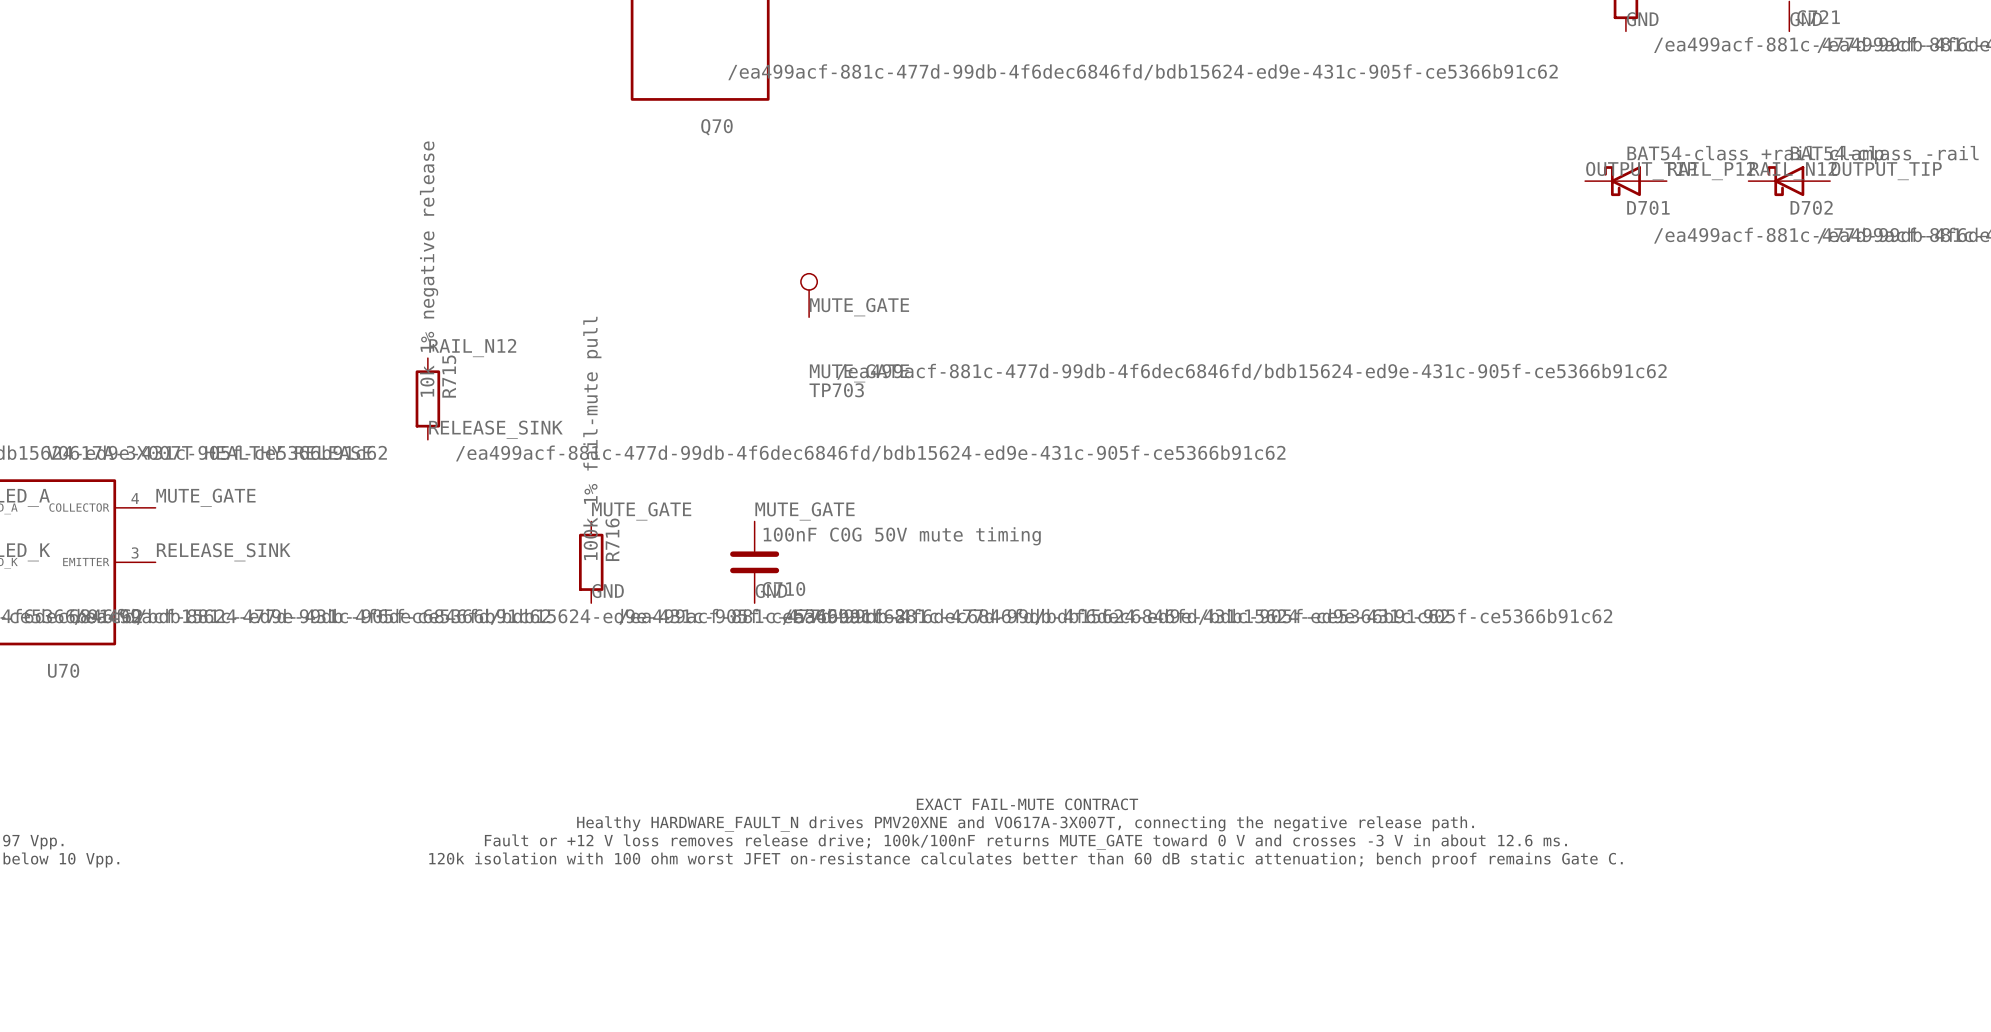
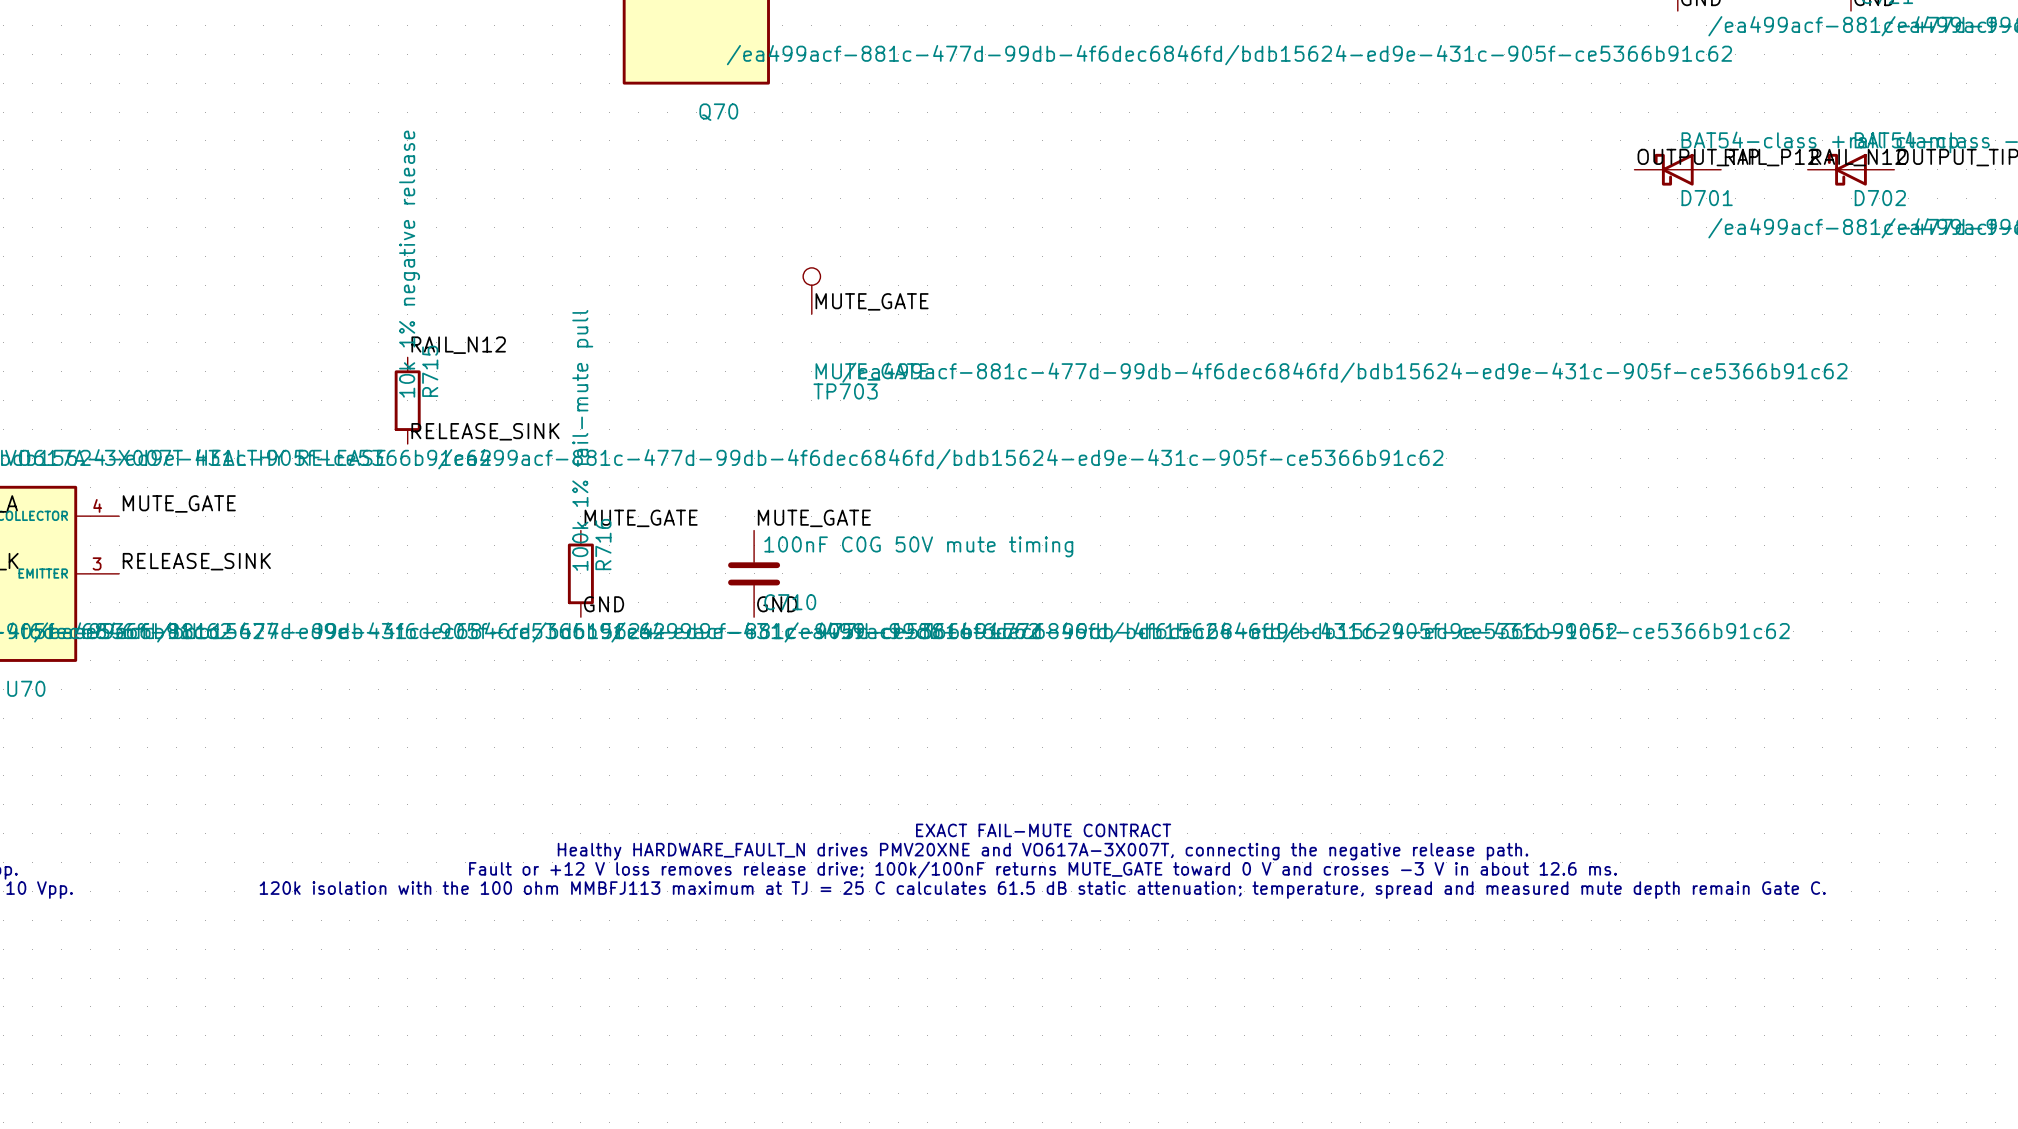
text: 120k isolation with 100 ohm worst JFET on-resistance calculates better than 60 dB static attenuation; bench proof remains Gate C. (1025, 860) -> 120k isolation with the 100 ohm MMBFJ113 maximum at TJ = 25 C calculates 61.5 dB static attenuation; temperature, spread and measured mute depth remain Gate C. (1042, 890)

